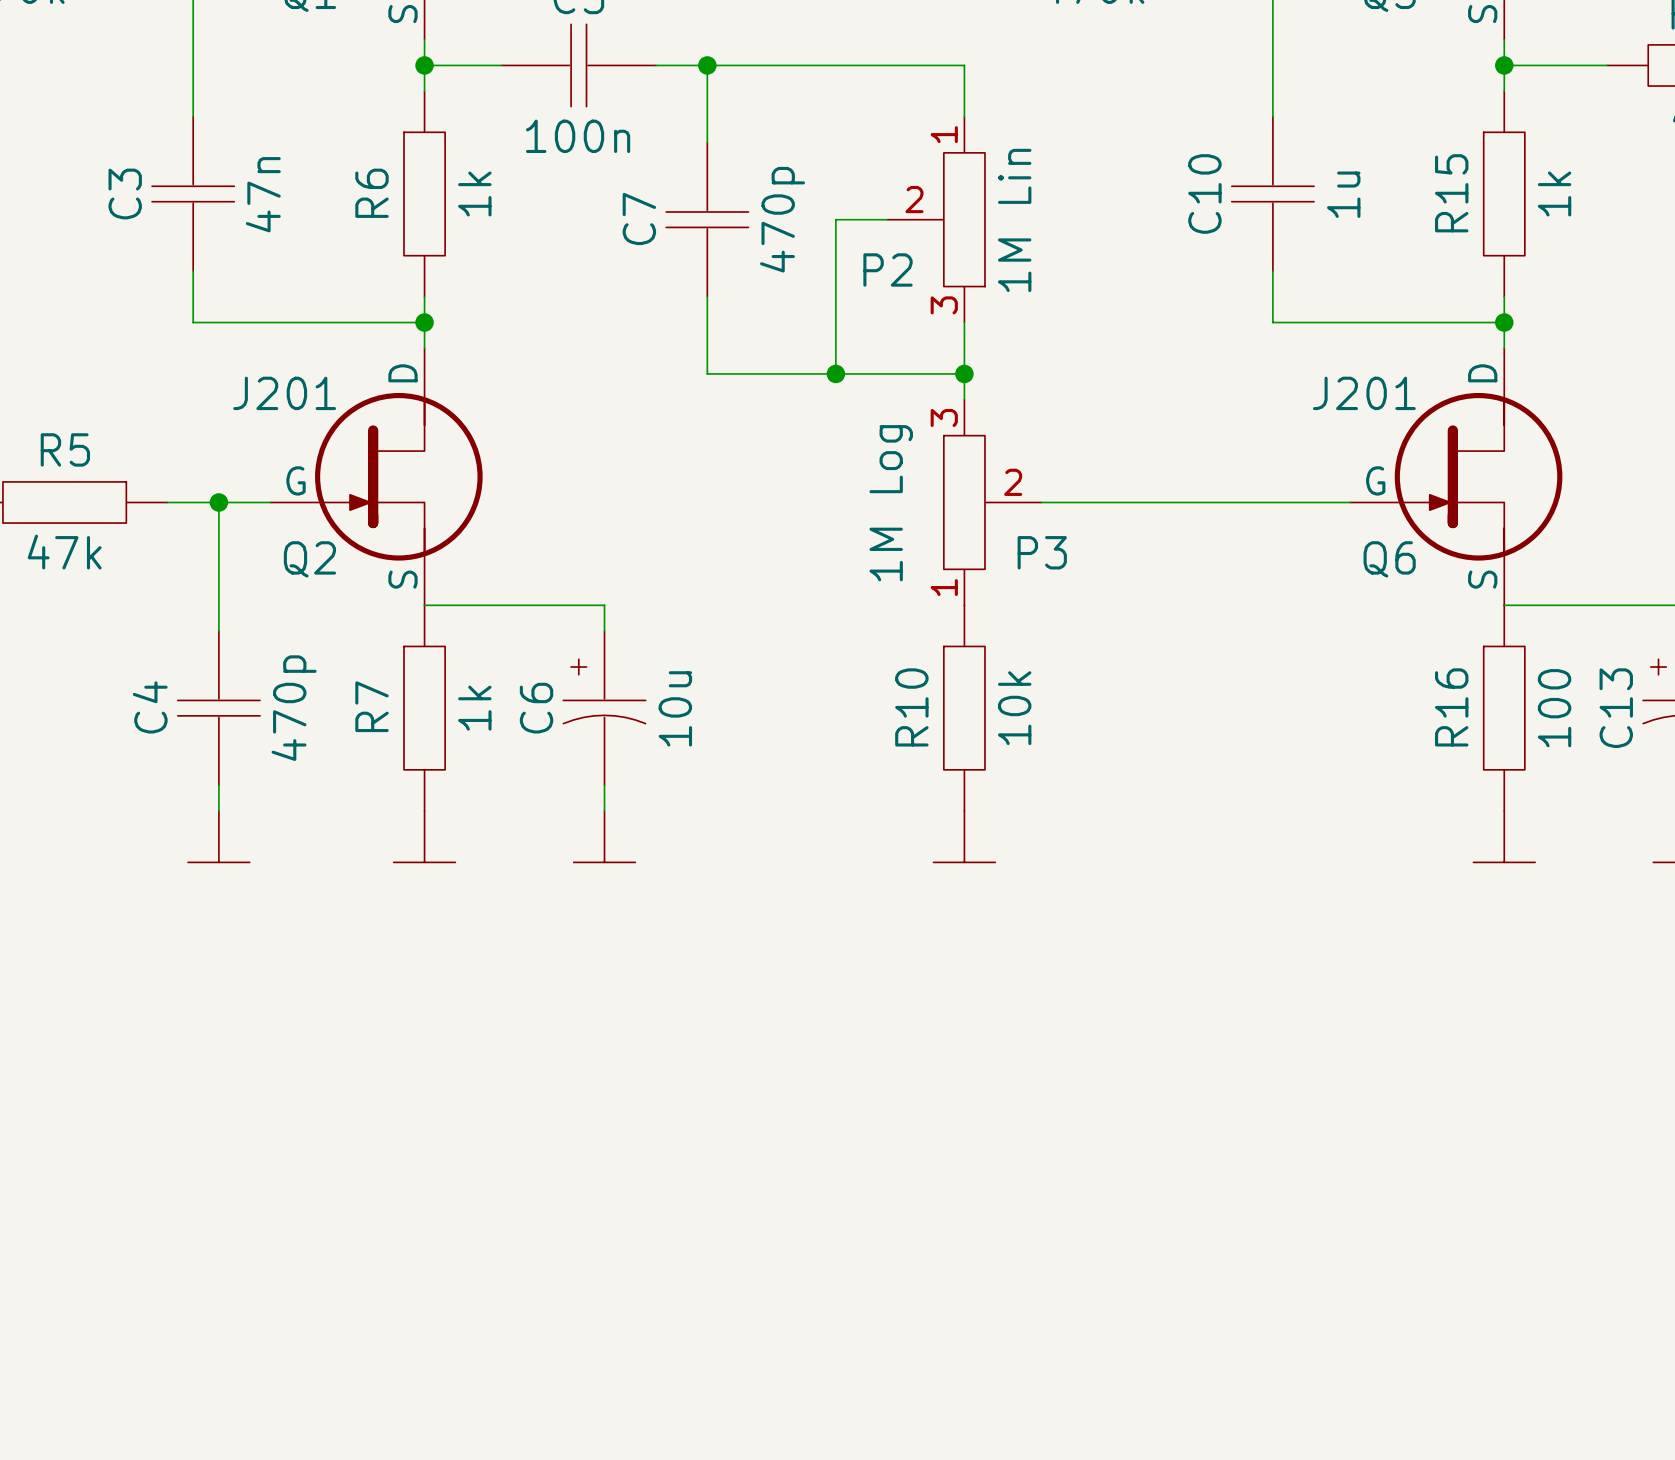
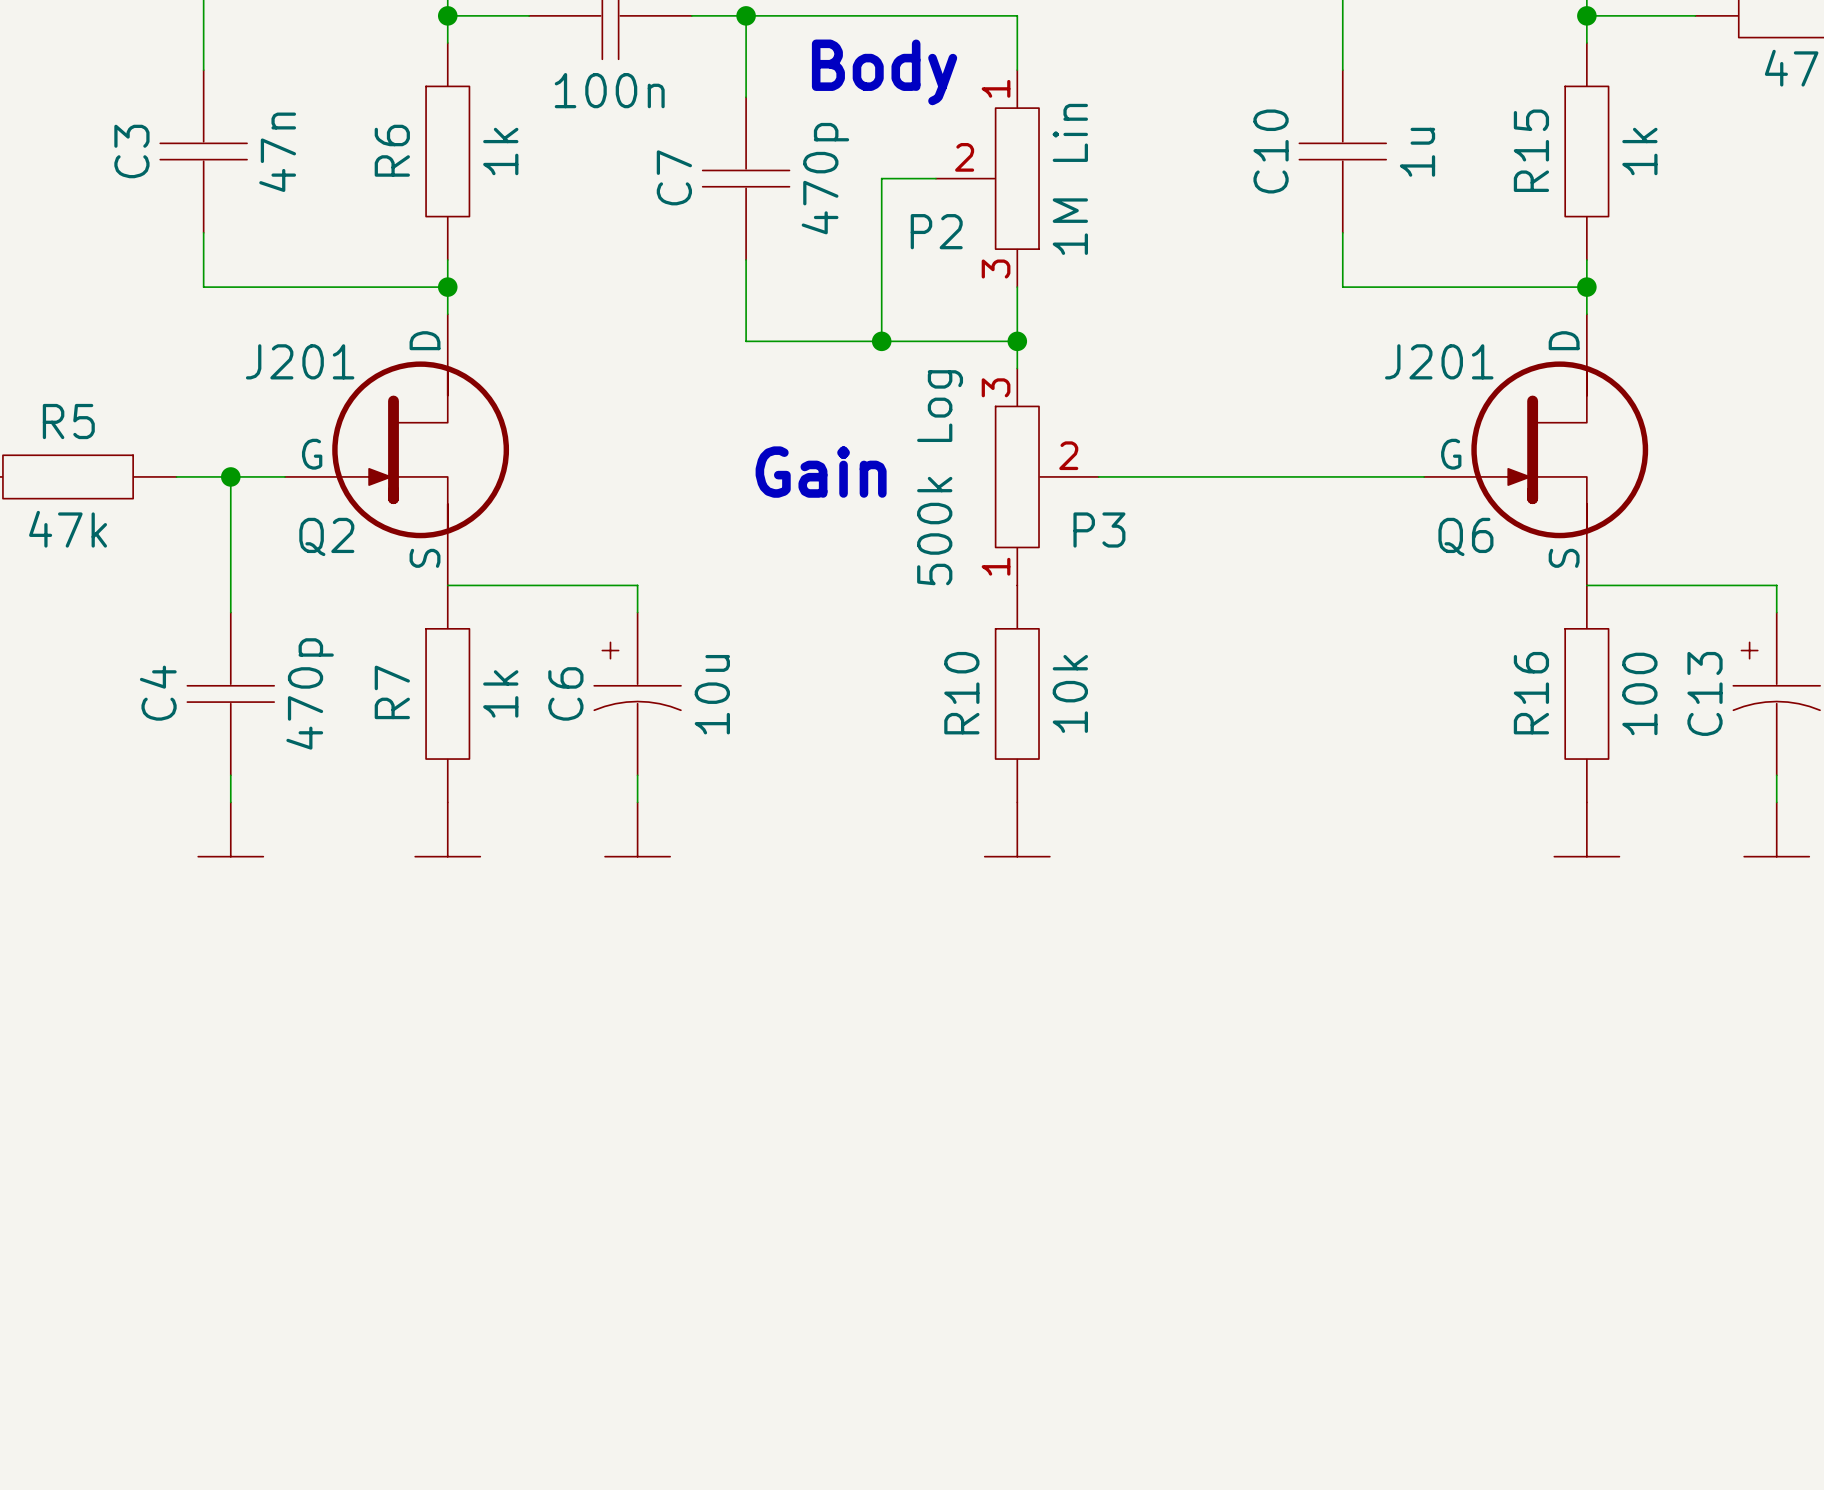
text: none -> Body (884, 72)
text: none -> Gain (821, 472)
P3 value: 1M Log (891, 503) -> 500k Log (940, 477)

